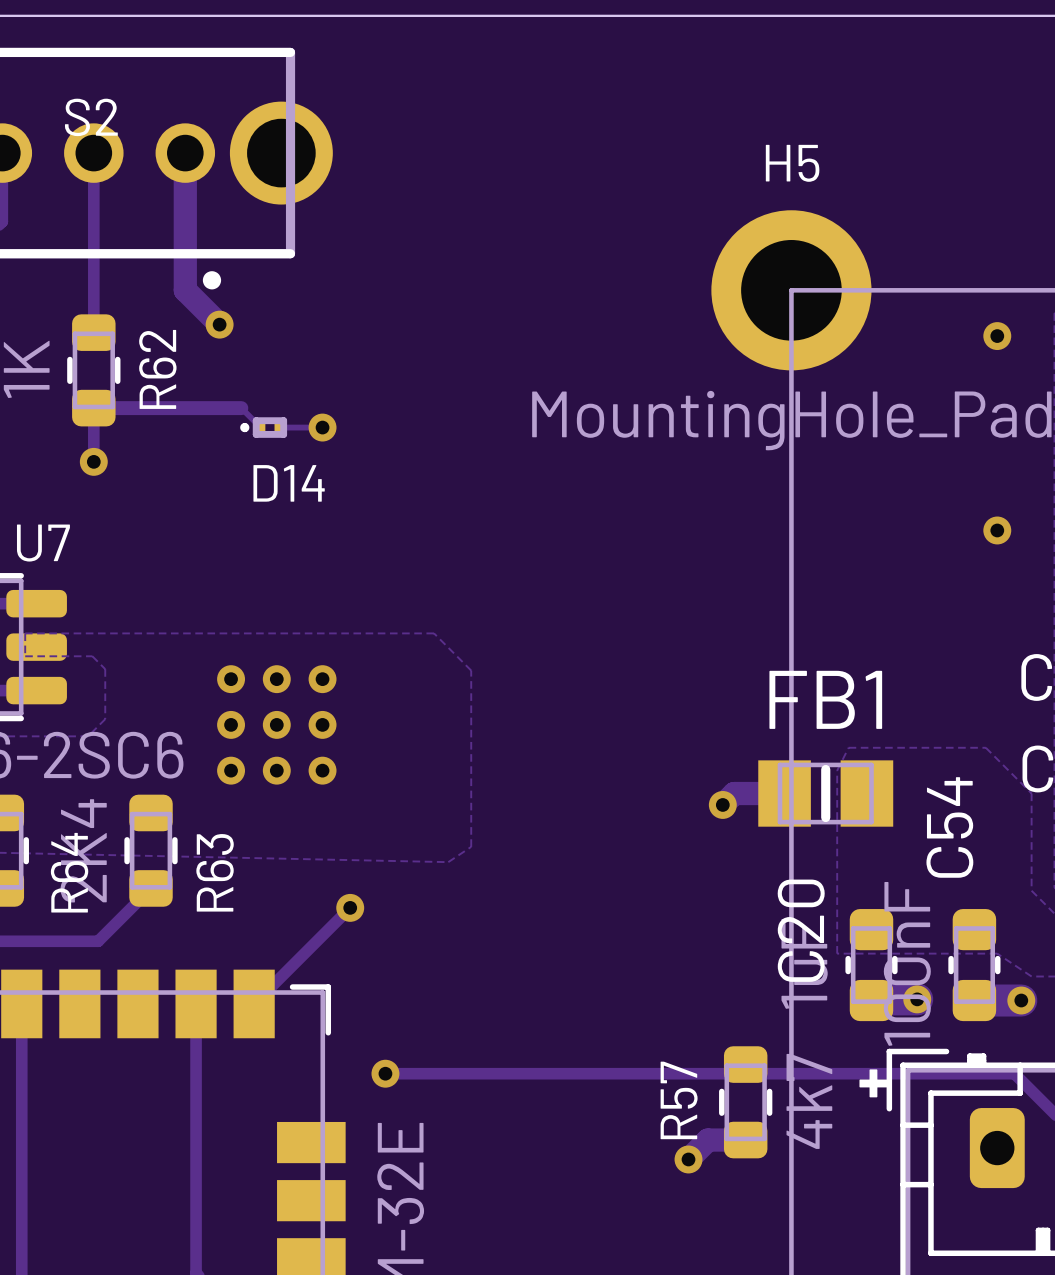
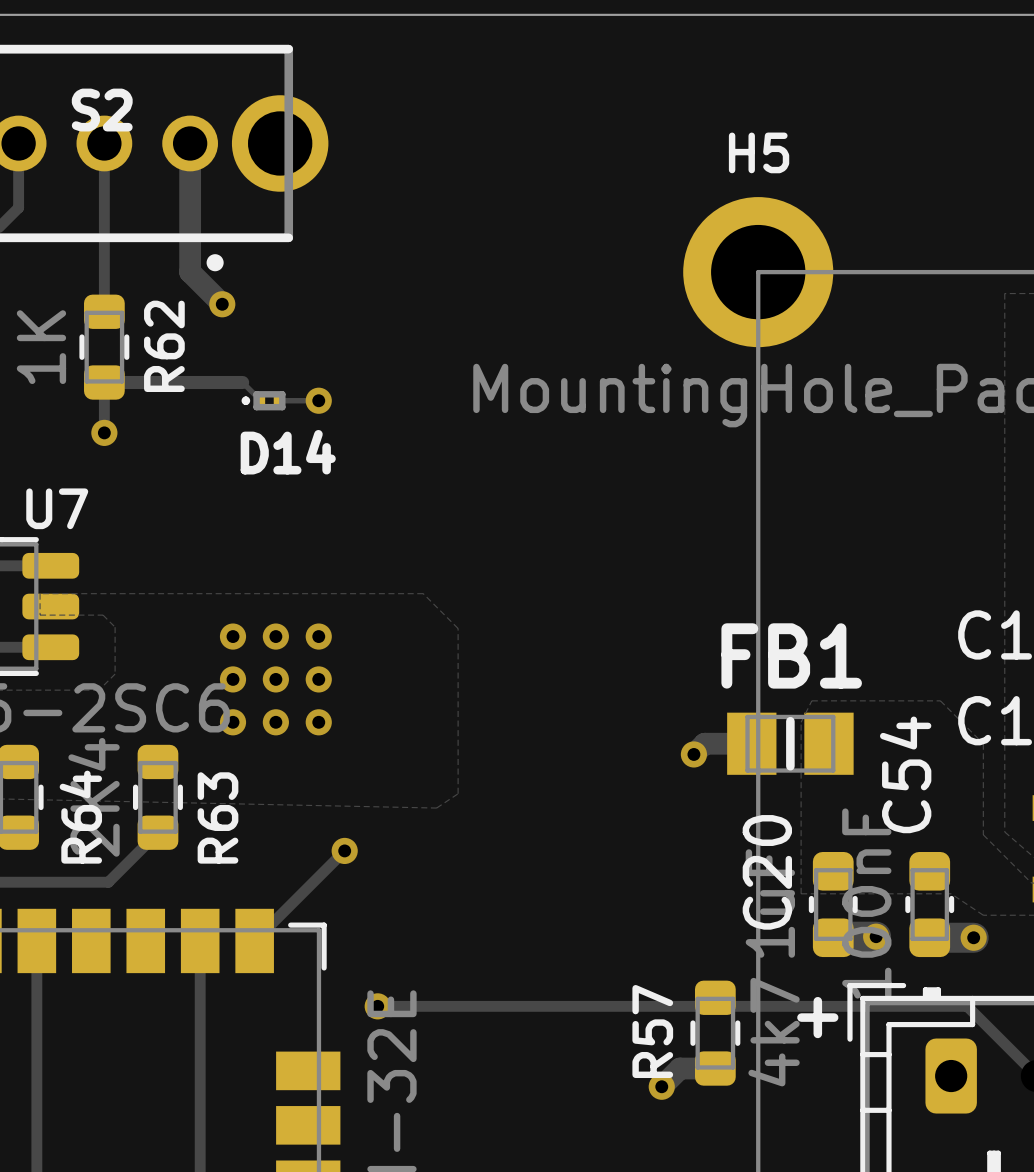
via: (997, 336) -> none
via: (997, 530) -> none

